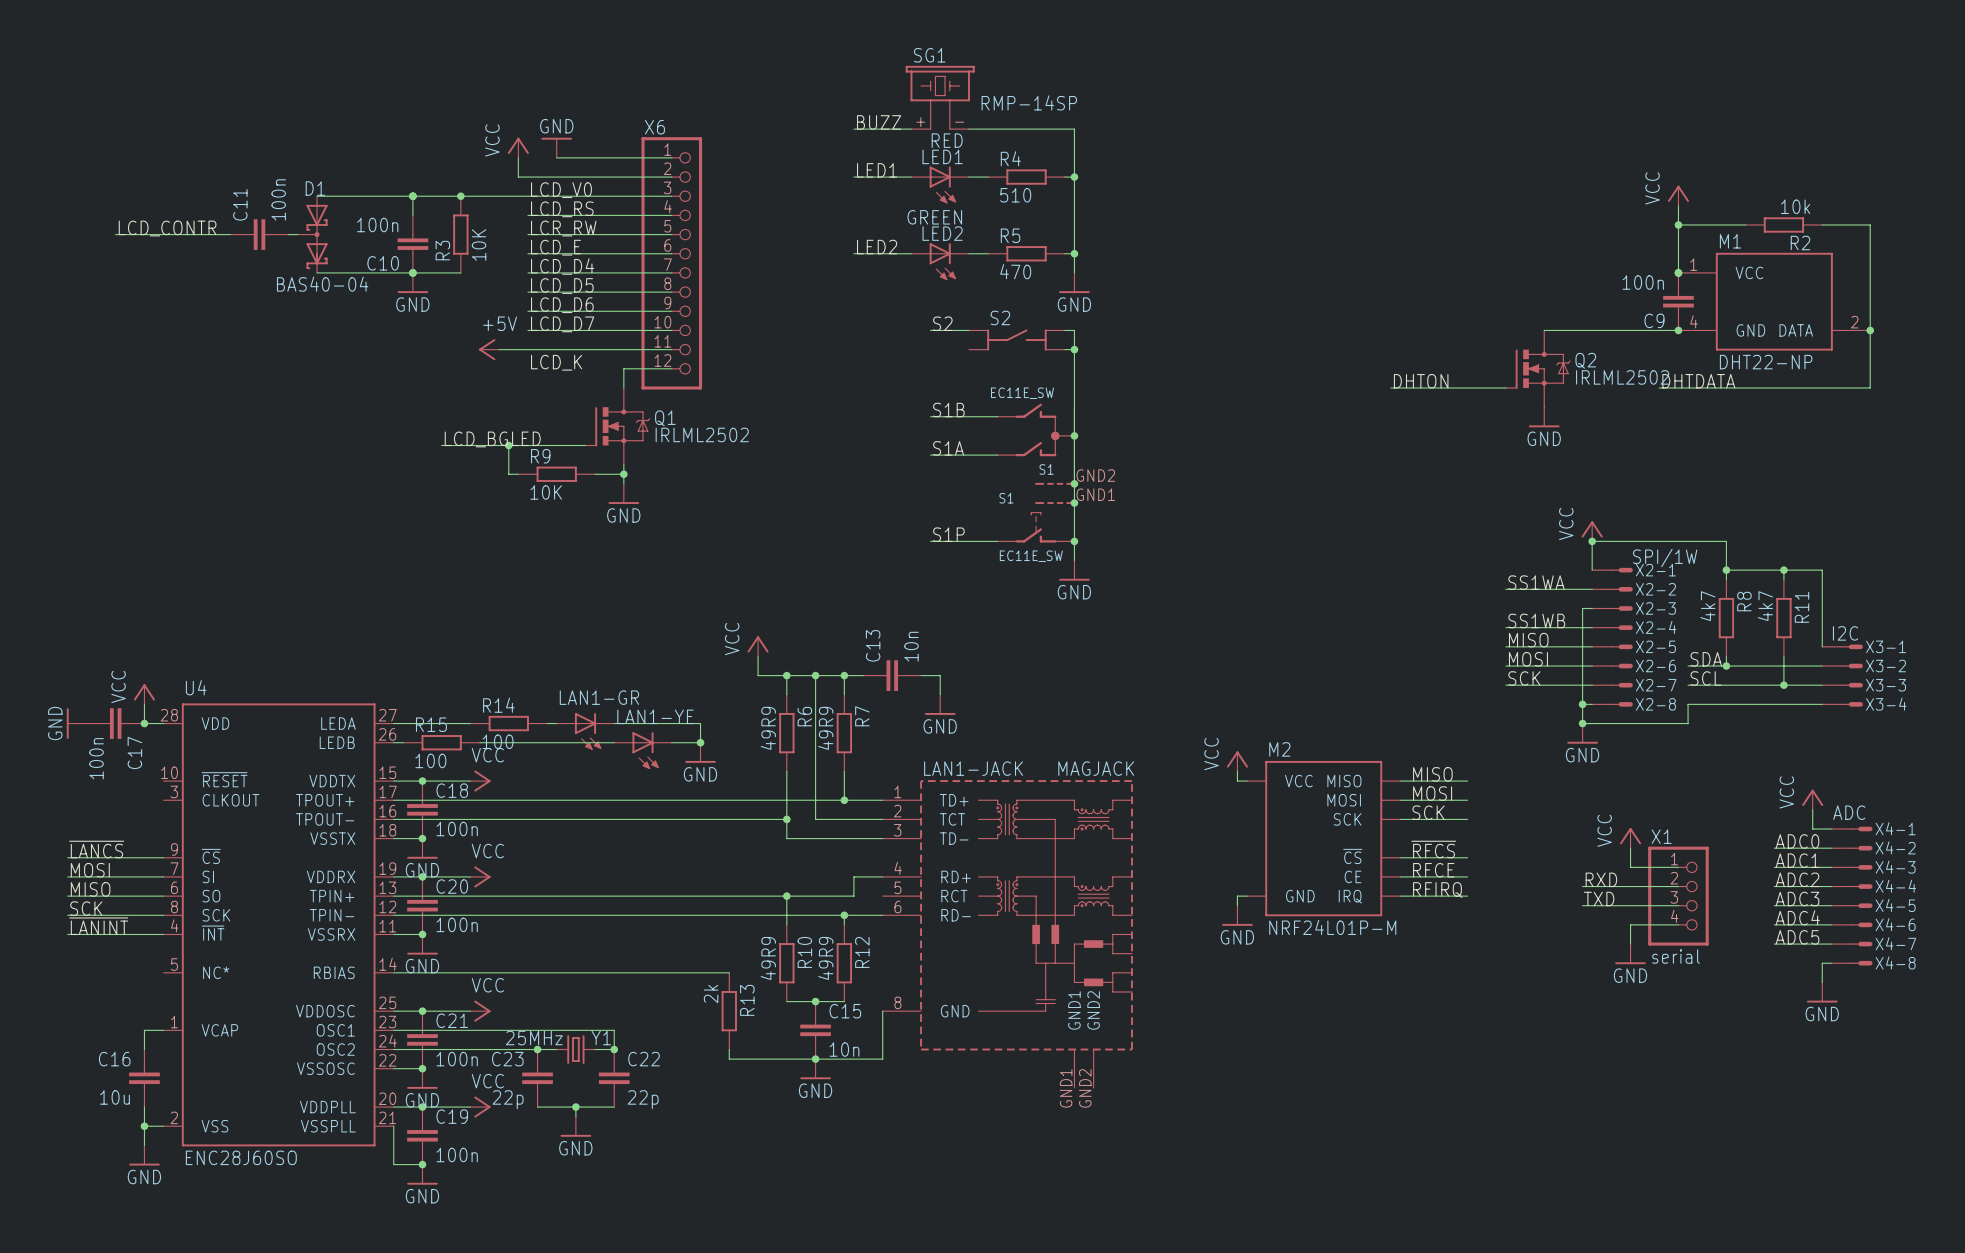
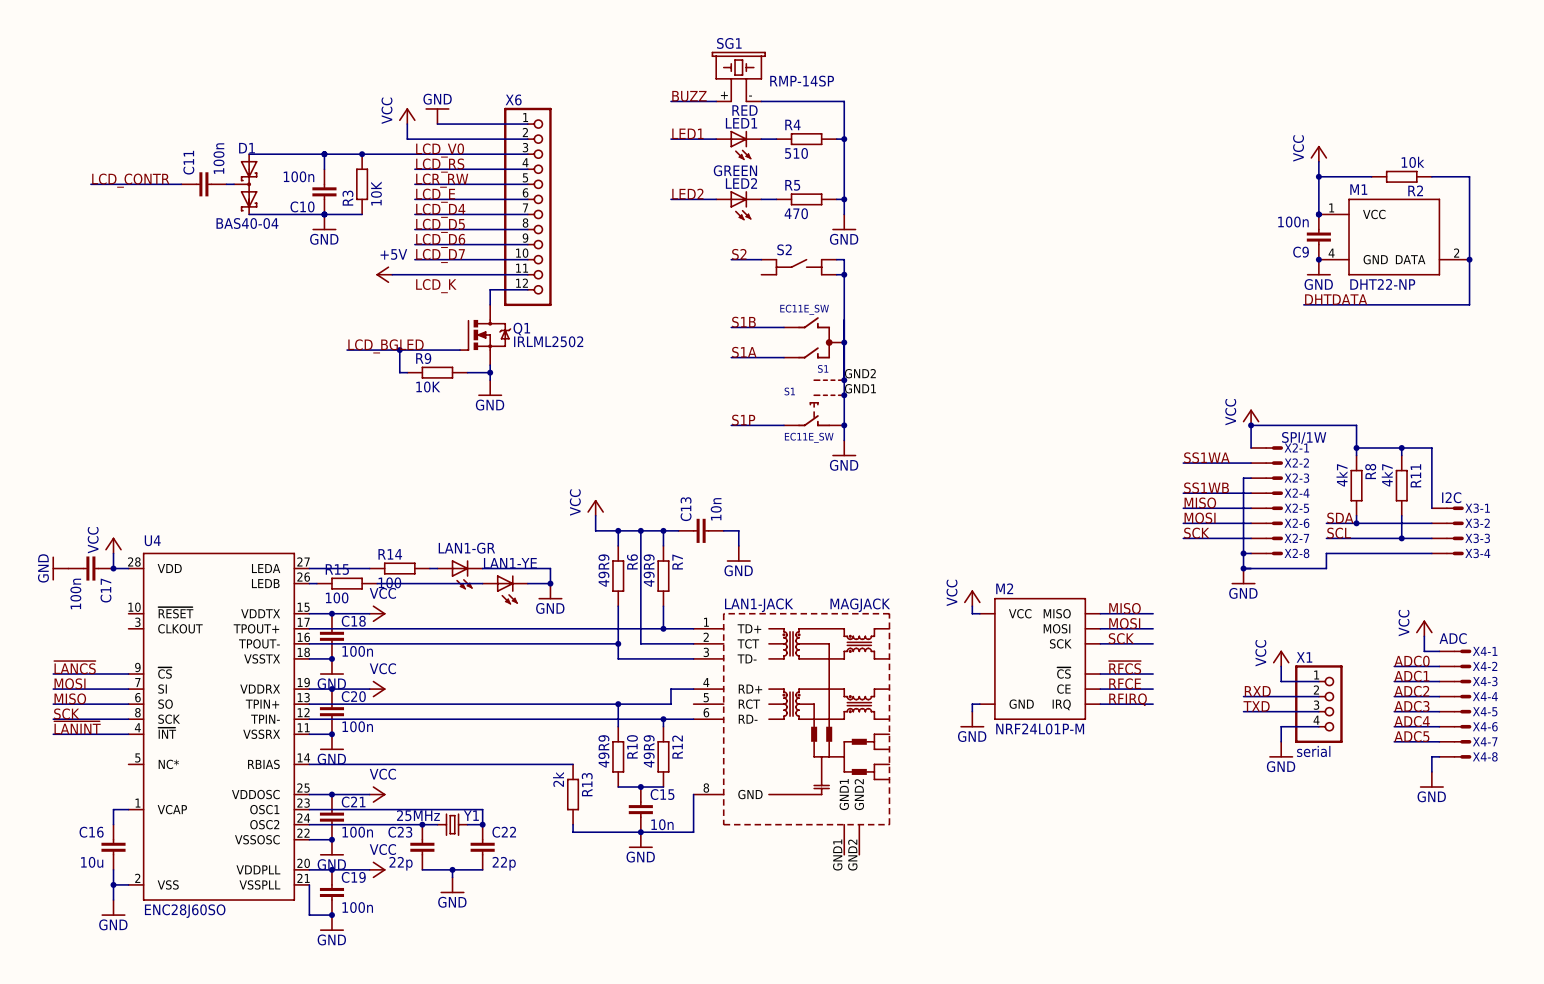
wire: (1544, 330) (1678, 330) -> none
Q2: IRLML2502 (1538, 368) -> none
label: DHTON (1421, 381) -> none
wire: (1390, 387) (1505, 387) -> none
power symbol position: GND (1544, 417) -> GND (1318, 267)

